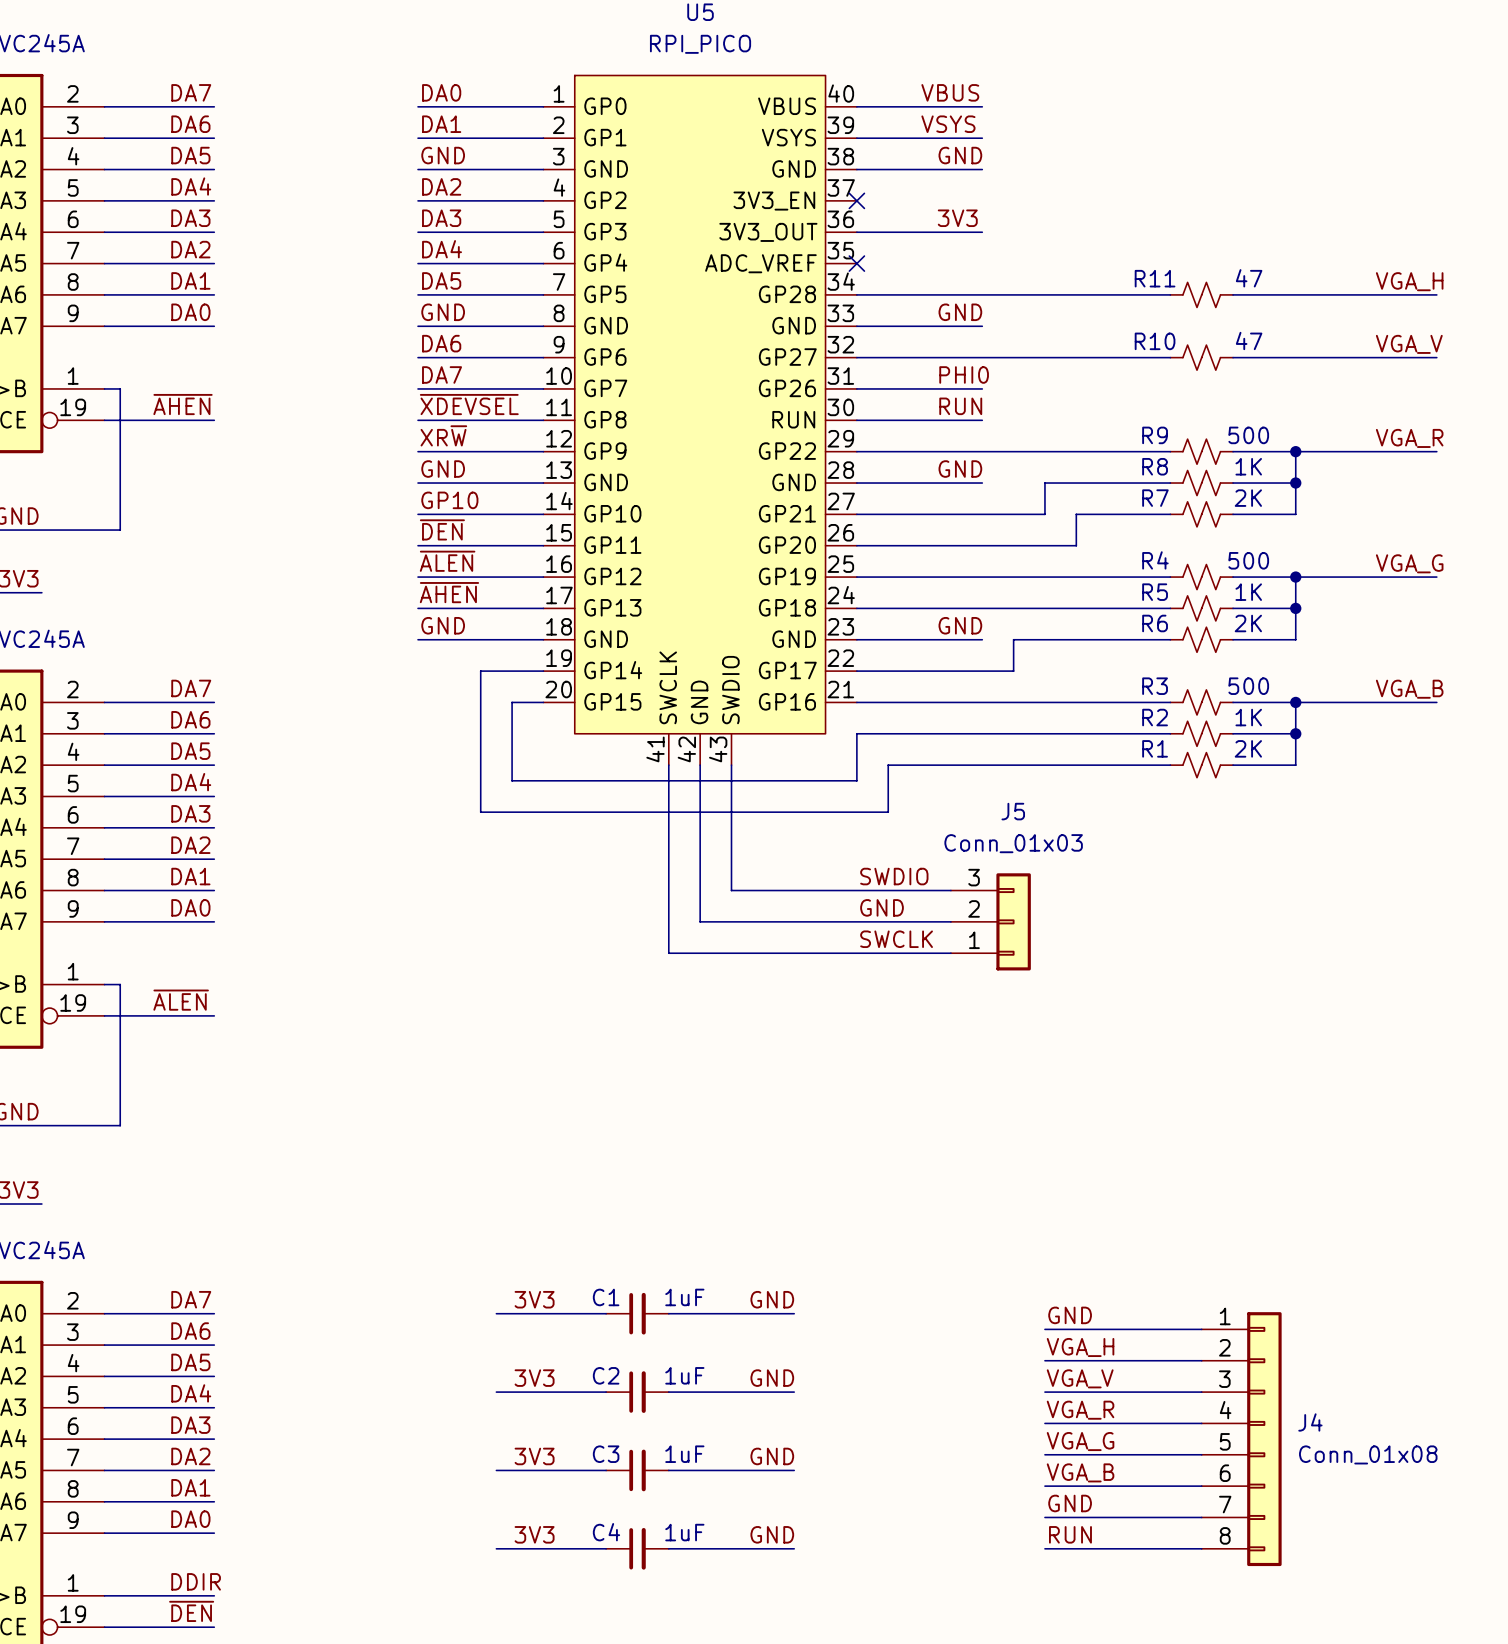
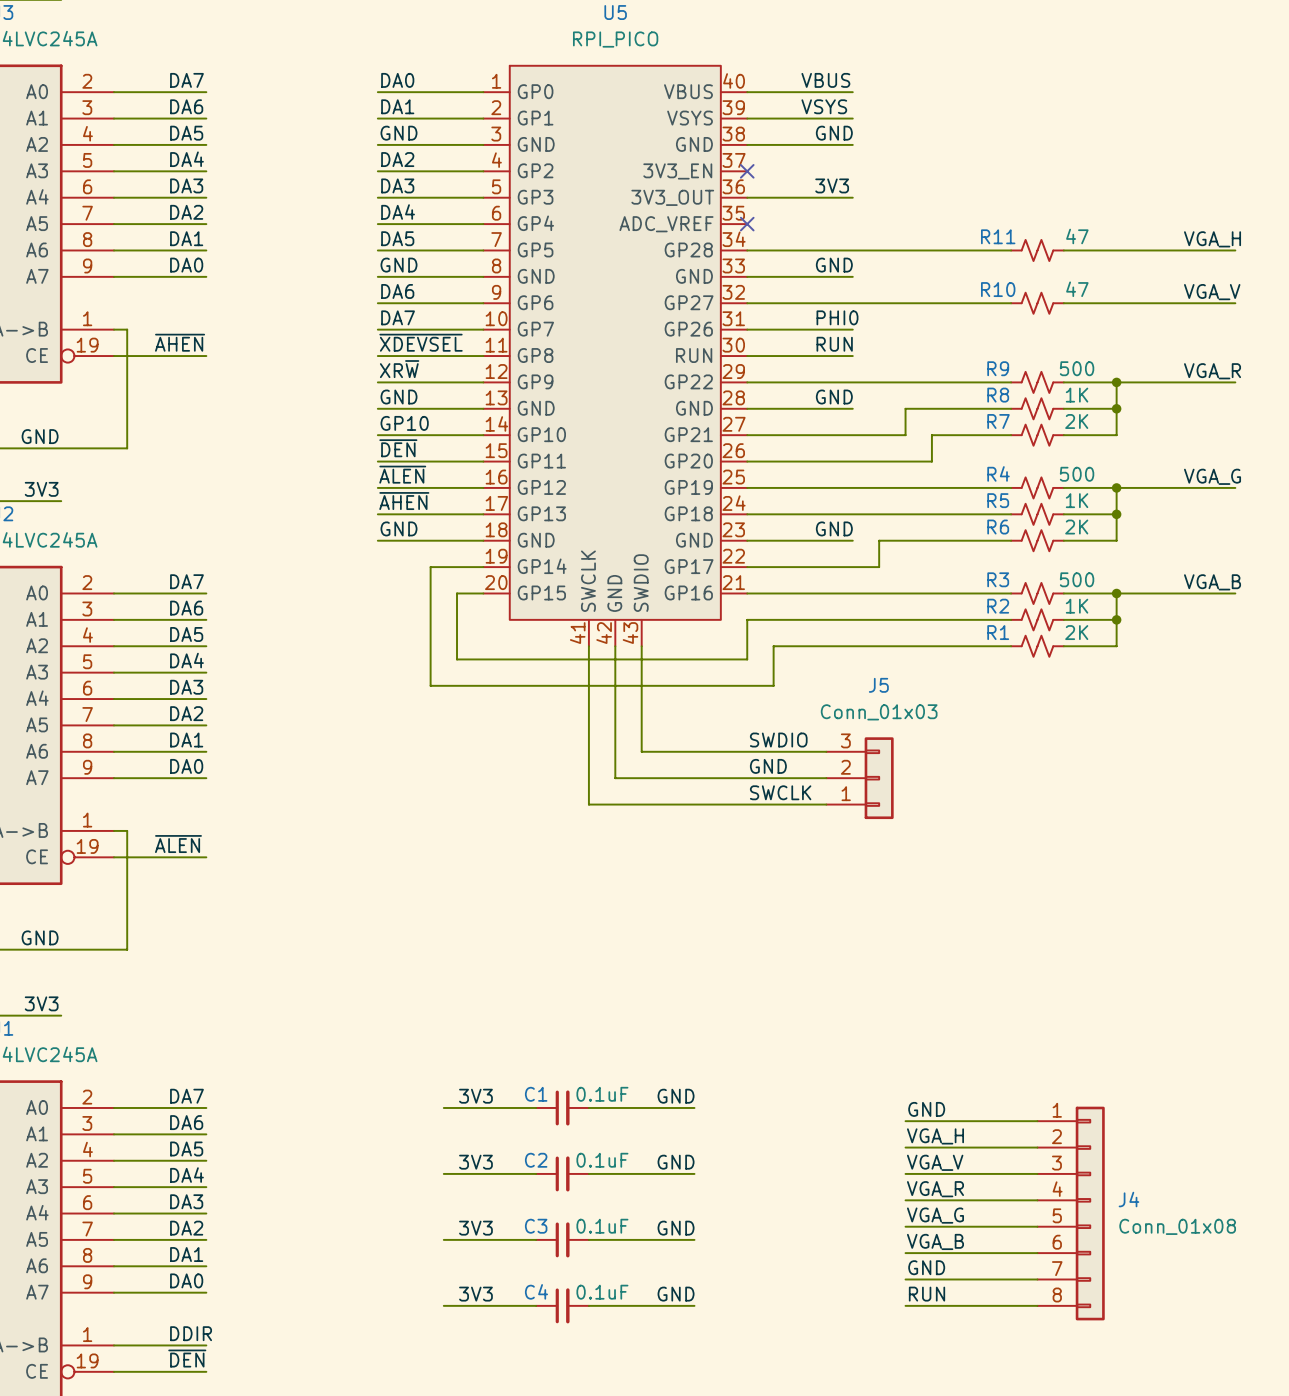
C1 value: 1uF (684, 1297) -> 0.1uF (602, 1094)
C2 value: 1uF (684, 1375) -> 0.1uF (602, 1160)
C3 value: 1uF (684, 1454) -> 0.1uF (602, 1226)
C4 value: 1uF (684, 1532) -> 0.1uF (602, 1292)

